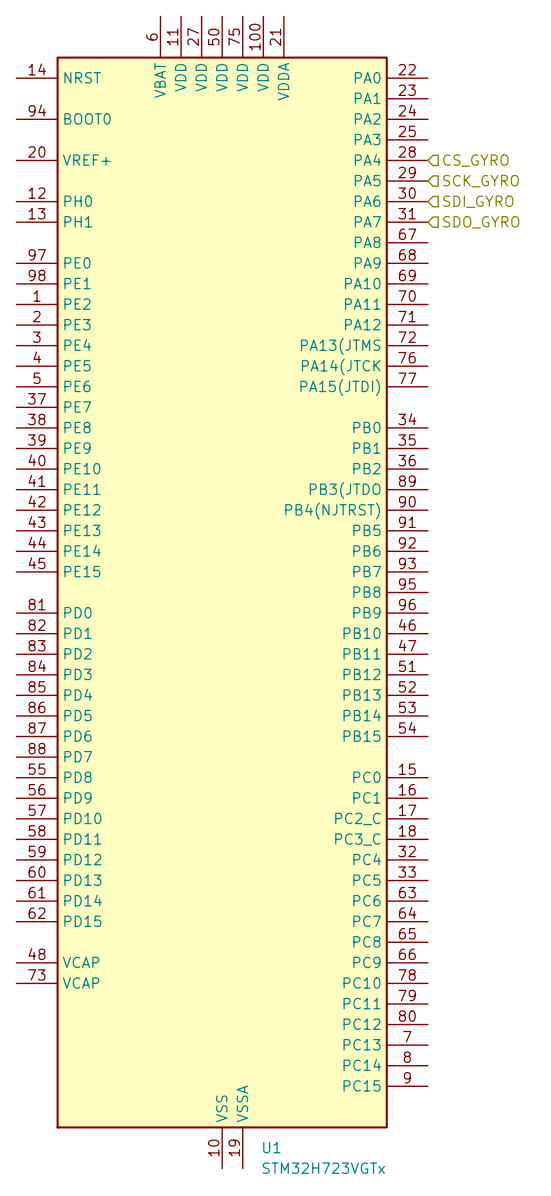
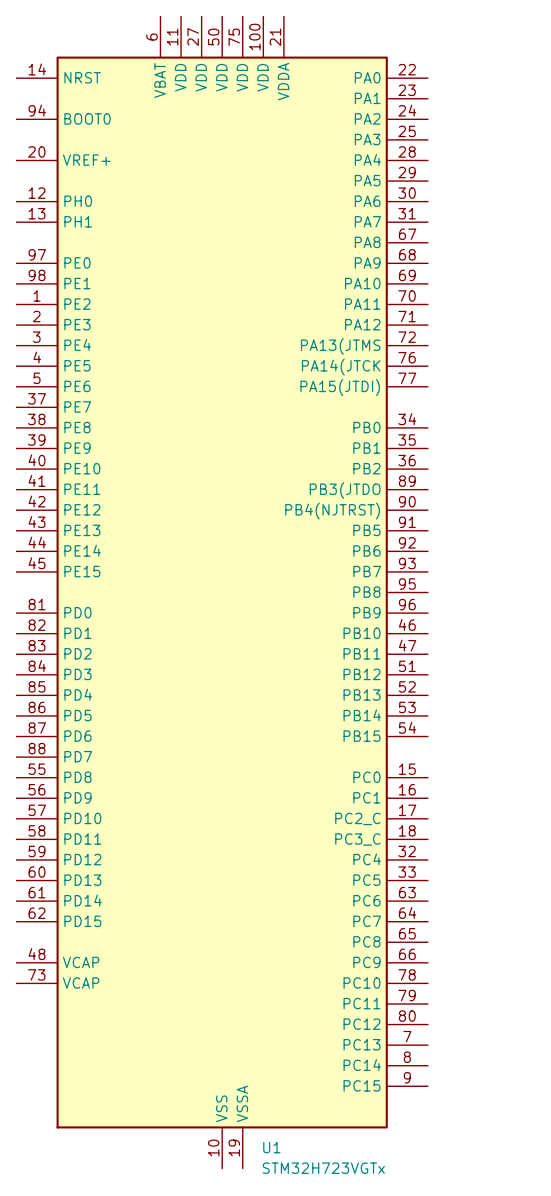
hierarchical label: CS_GYRO (475, 160) -> none
hierarchical label: SCK_GYRO (480, 181) -> none
hierarchical label: SDI_GYRO (478, 201) -> none
hierarchical label: SDO_GYRO (481, 222) -> none

